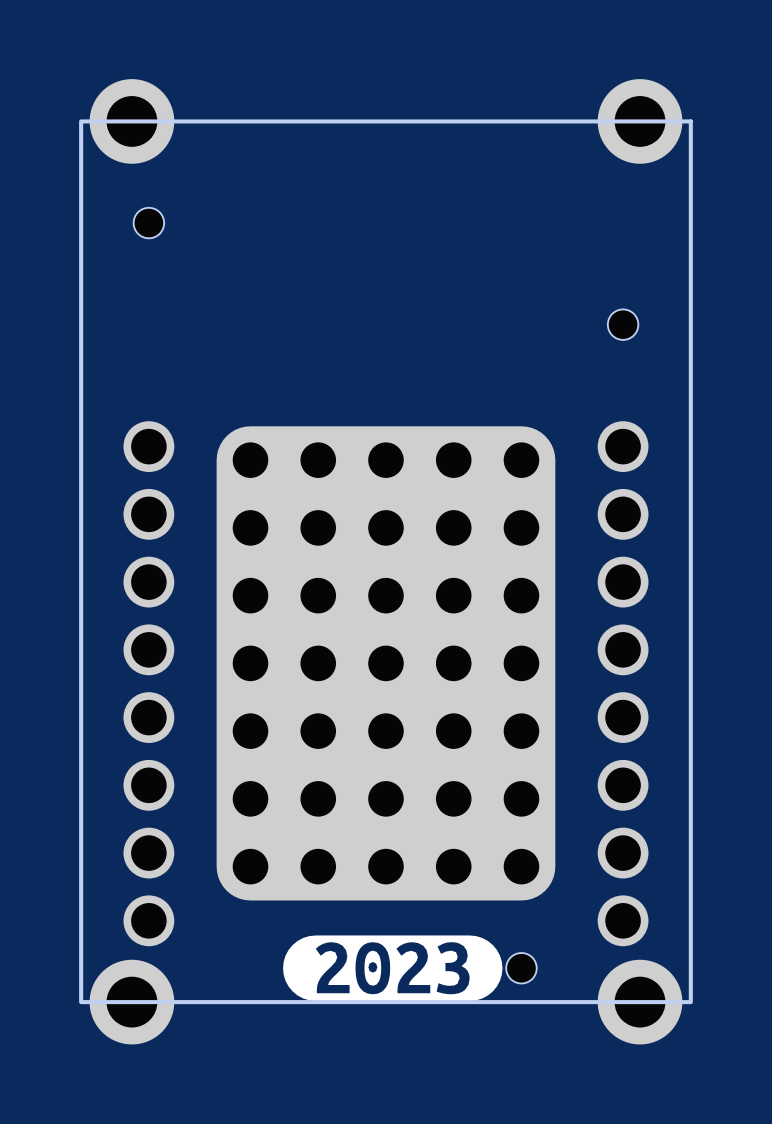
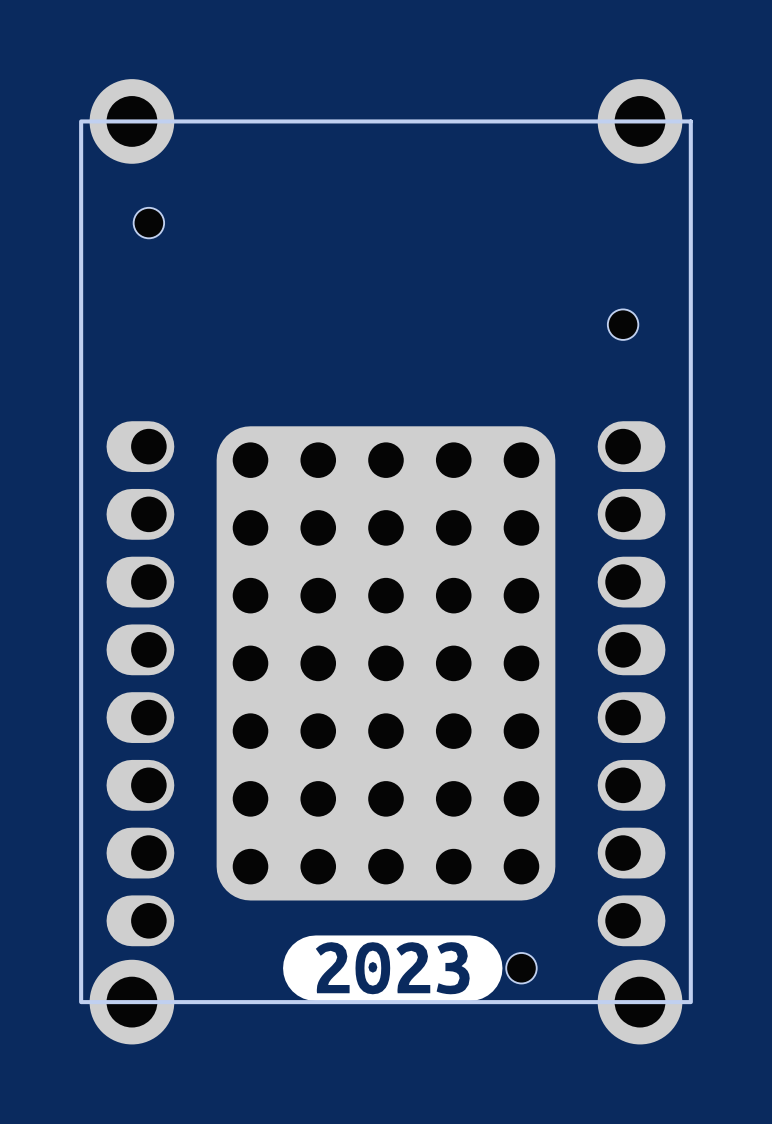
part footprint: [123, 421, 649, 947] -> [106, 421, 666, 947]

